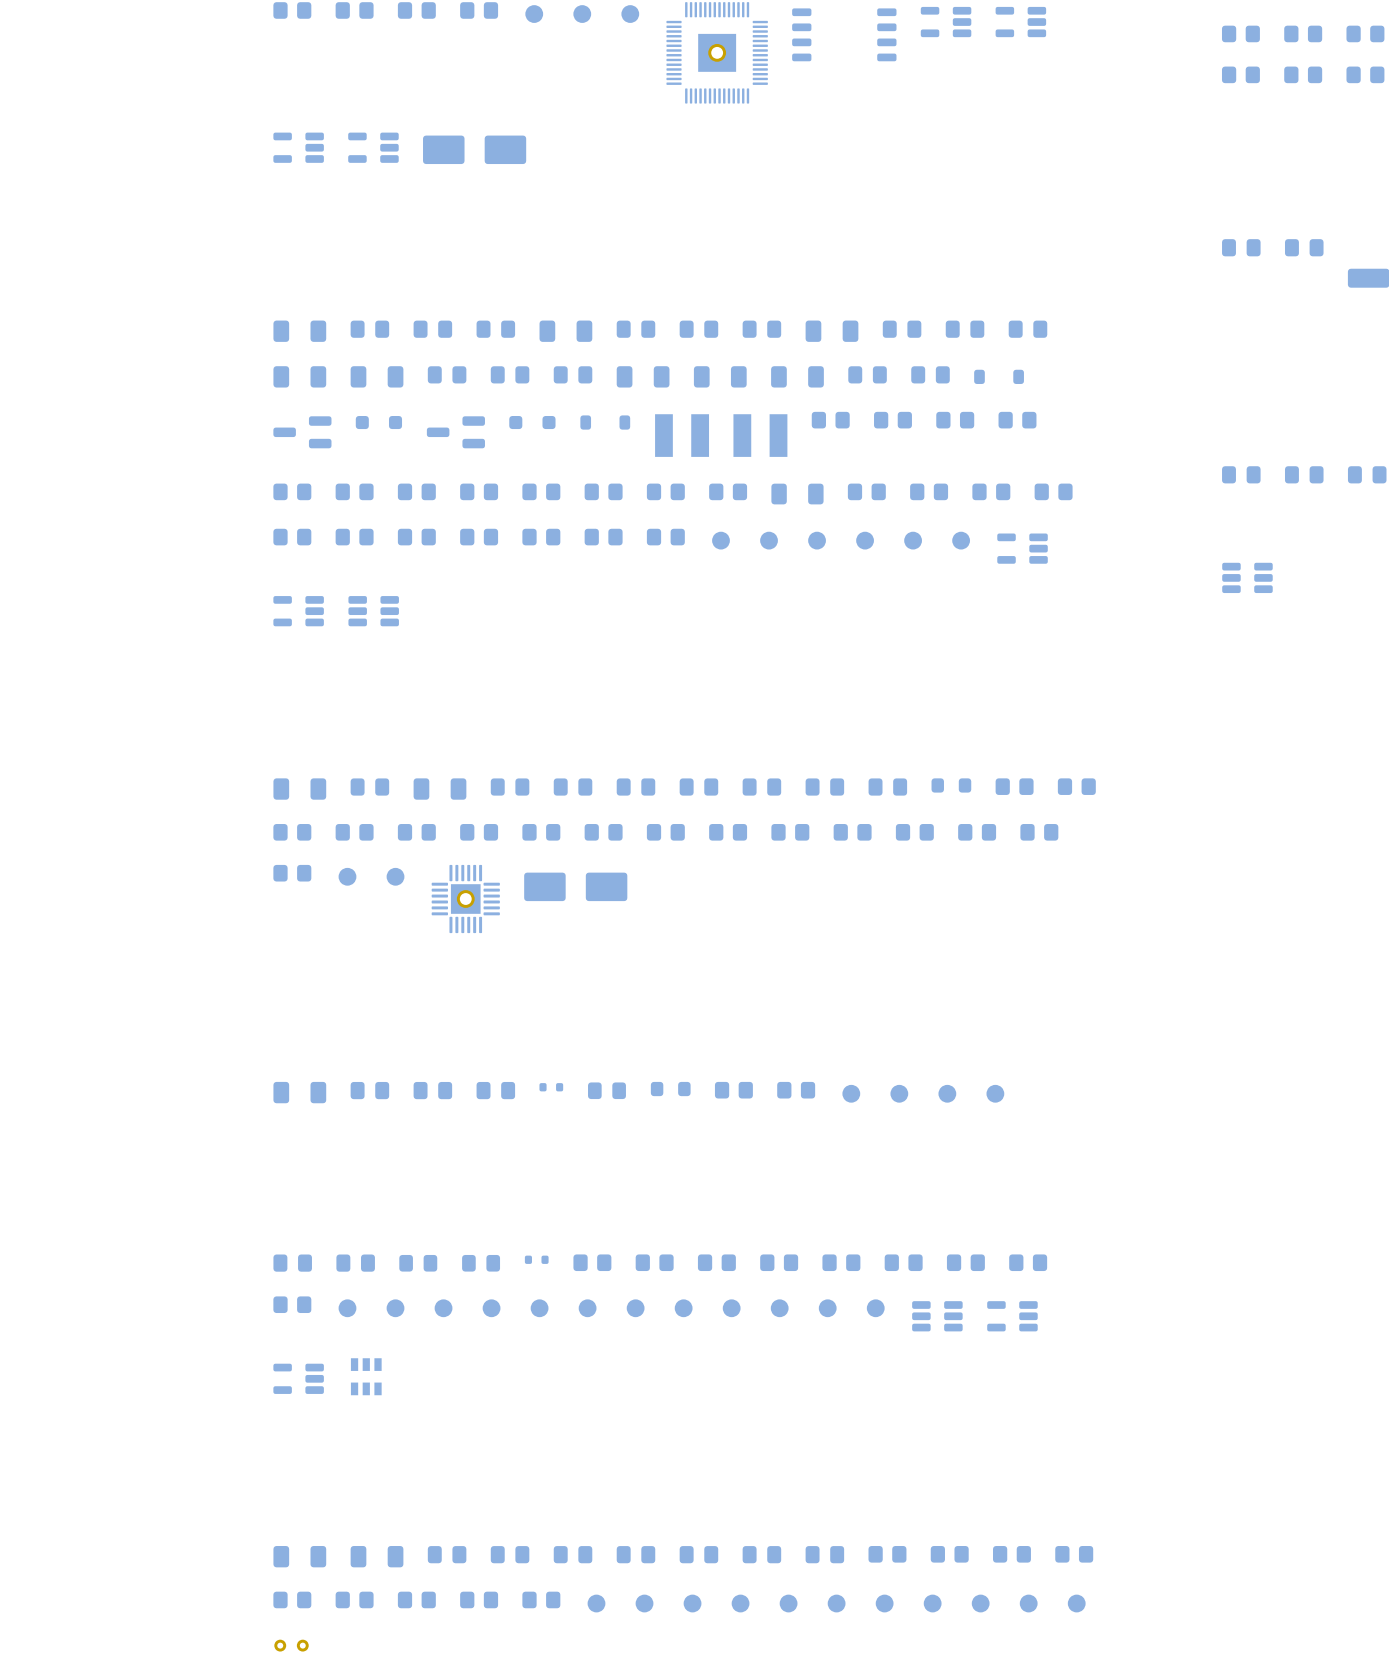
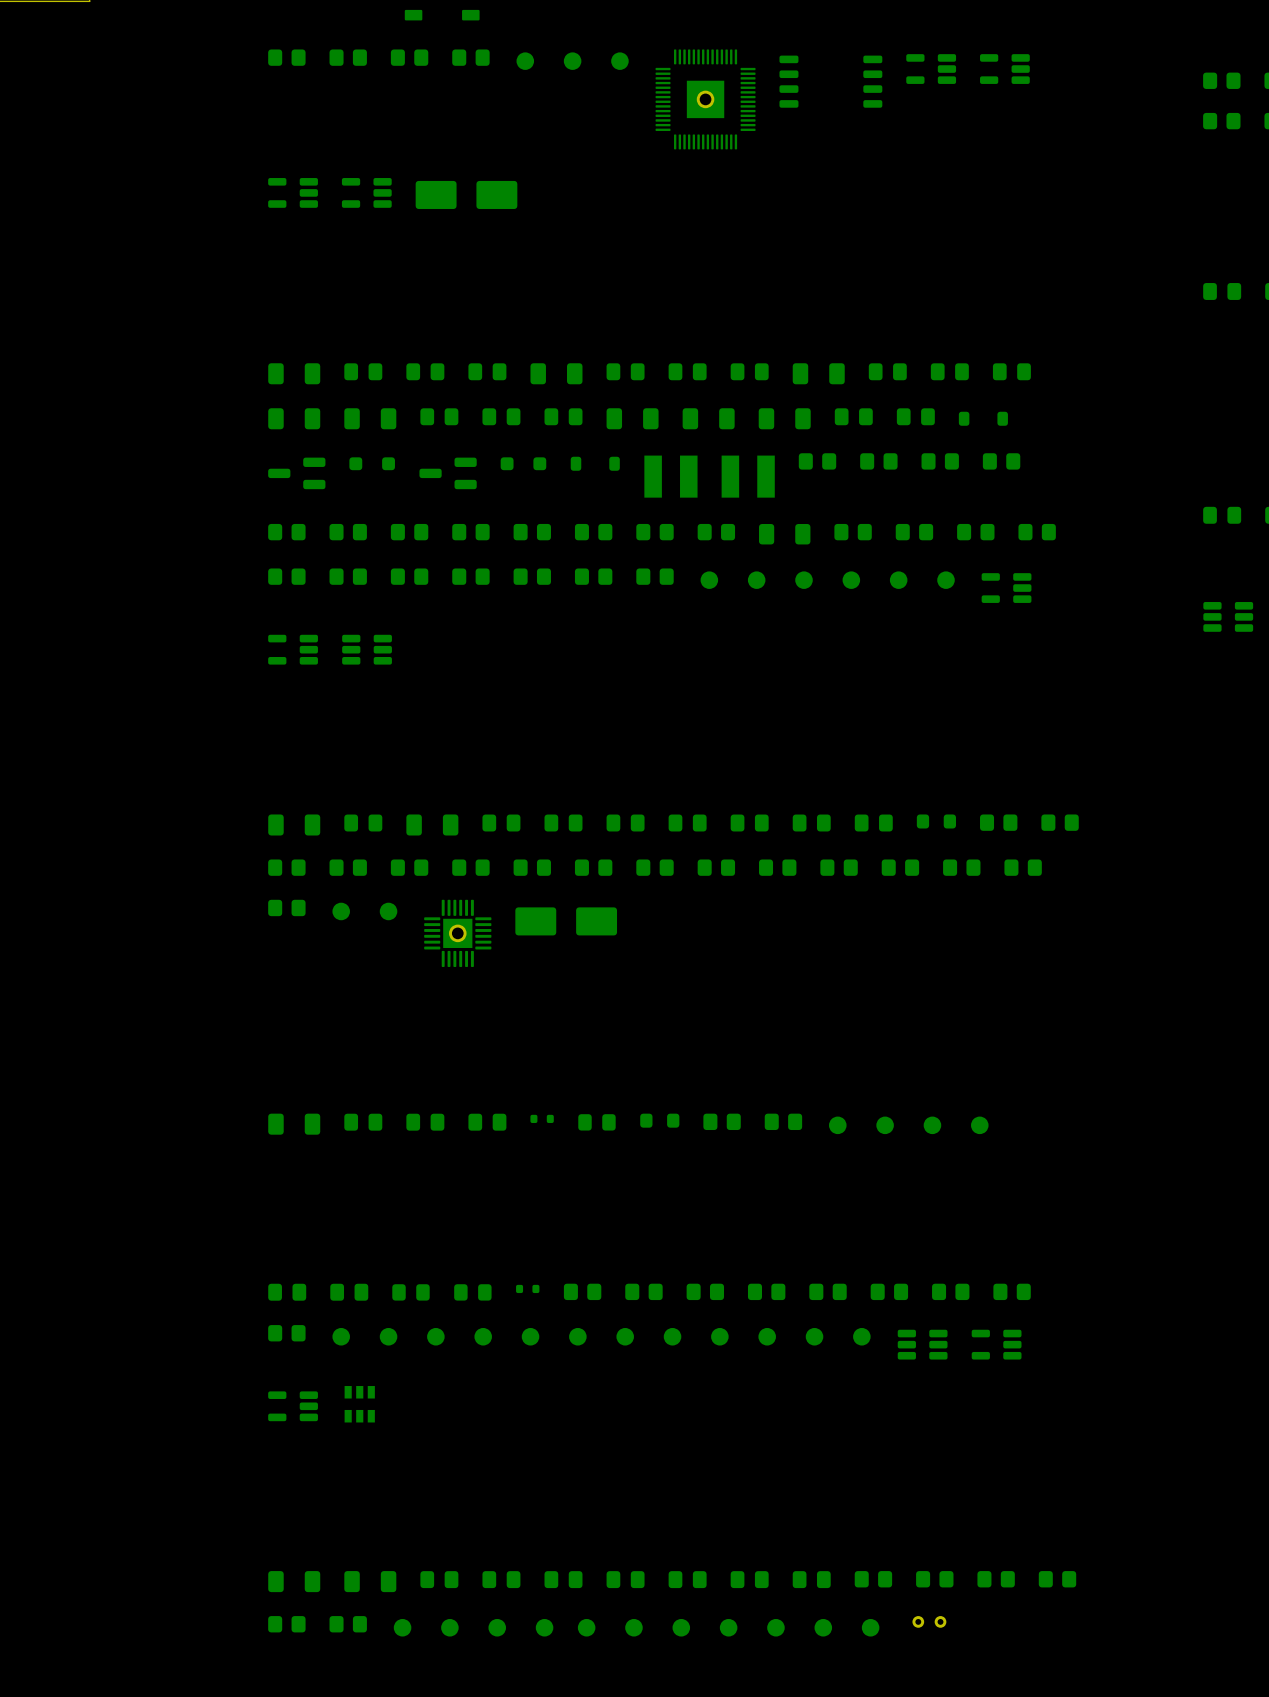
part footprint: [397, 1591, 436, 1609] -> [393, 1618, 412, 1637]
part: none -> (929, 1621)
part: (479, 1599) -> none
part: (541, 1599) -> none
part: none -> (449, 1627)
part: none -> (497, 1627)
part: none -> (544, 1627)
part: (932, 1603) -> none
part: (980, 1603) -> none
part: (1028, 1603) -> none
part: (1076, 1603) -> none
part: (291, 1645) -> none

